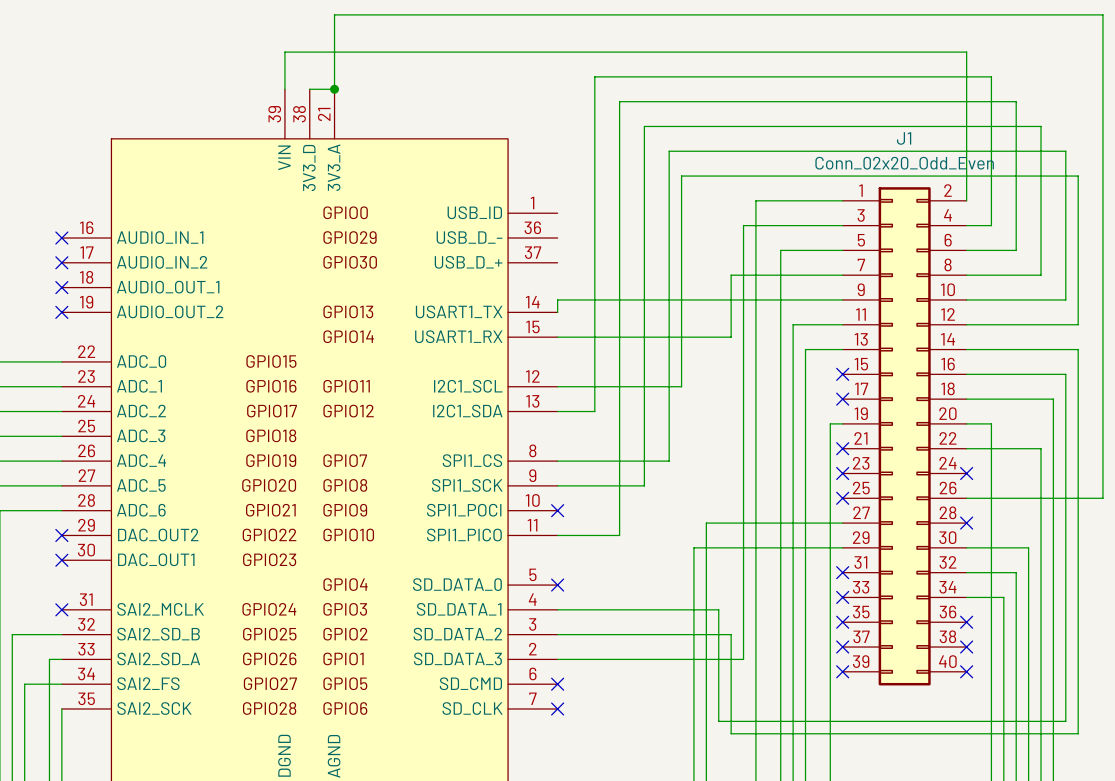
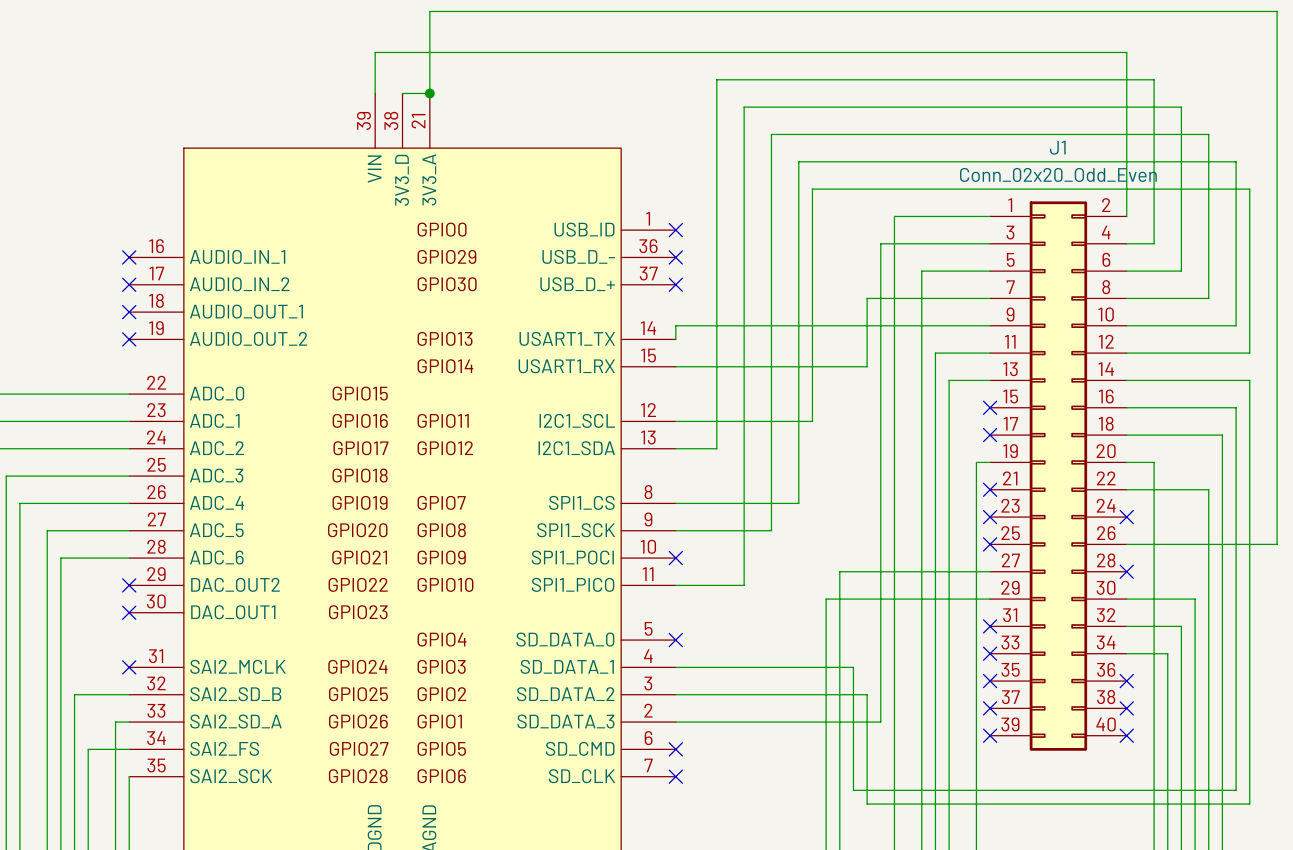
no-connect mark: none -> (675, 230)
no-connect mark: none -> (675, 257)
no-connect mark: none -> (675, 284)

